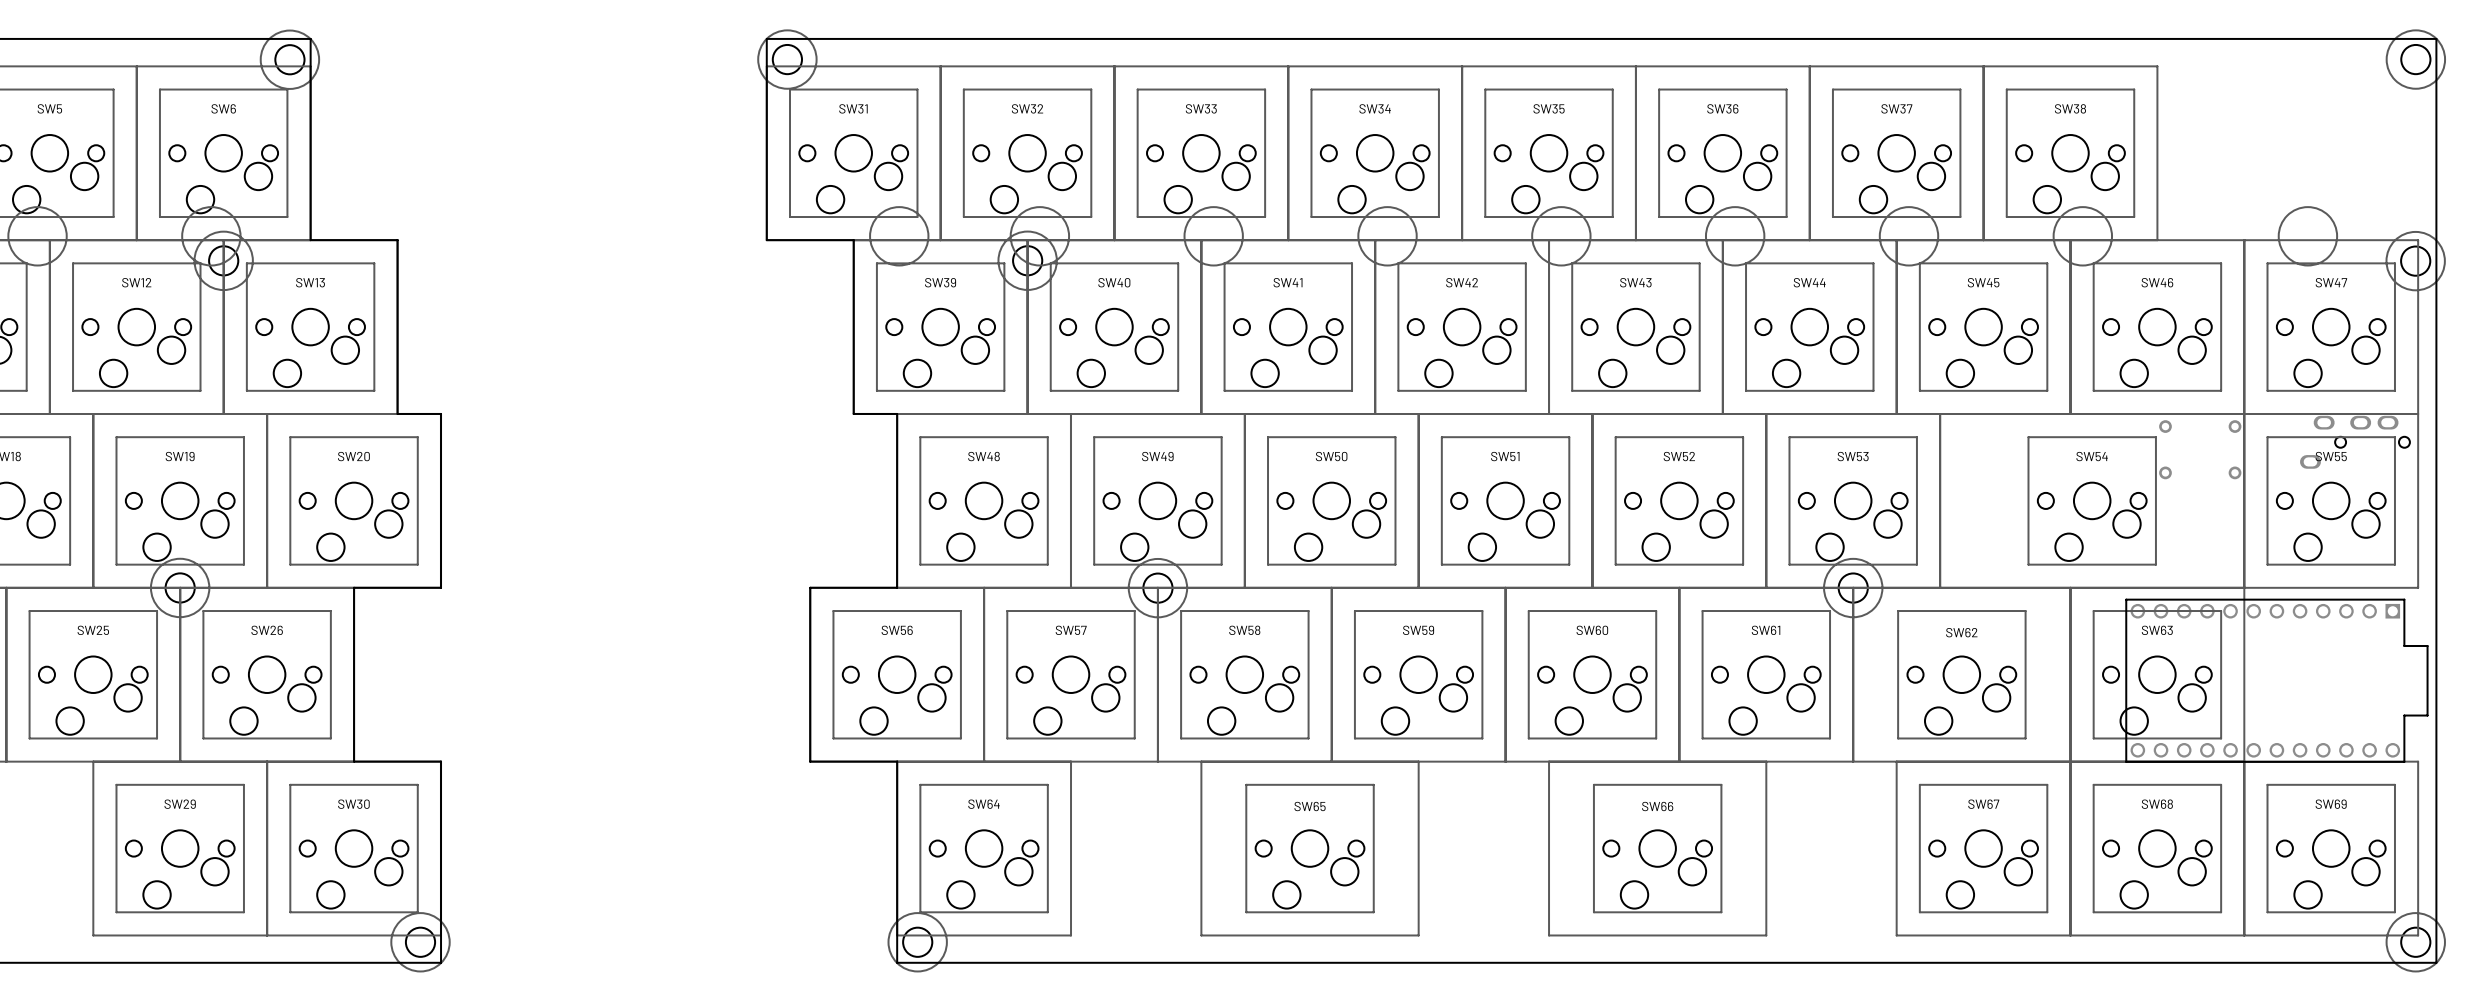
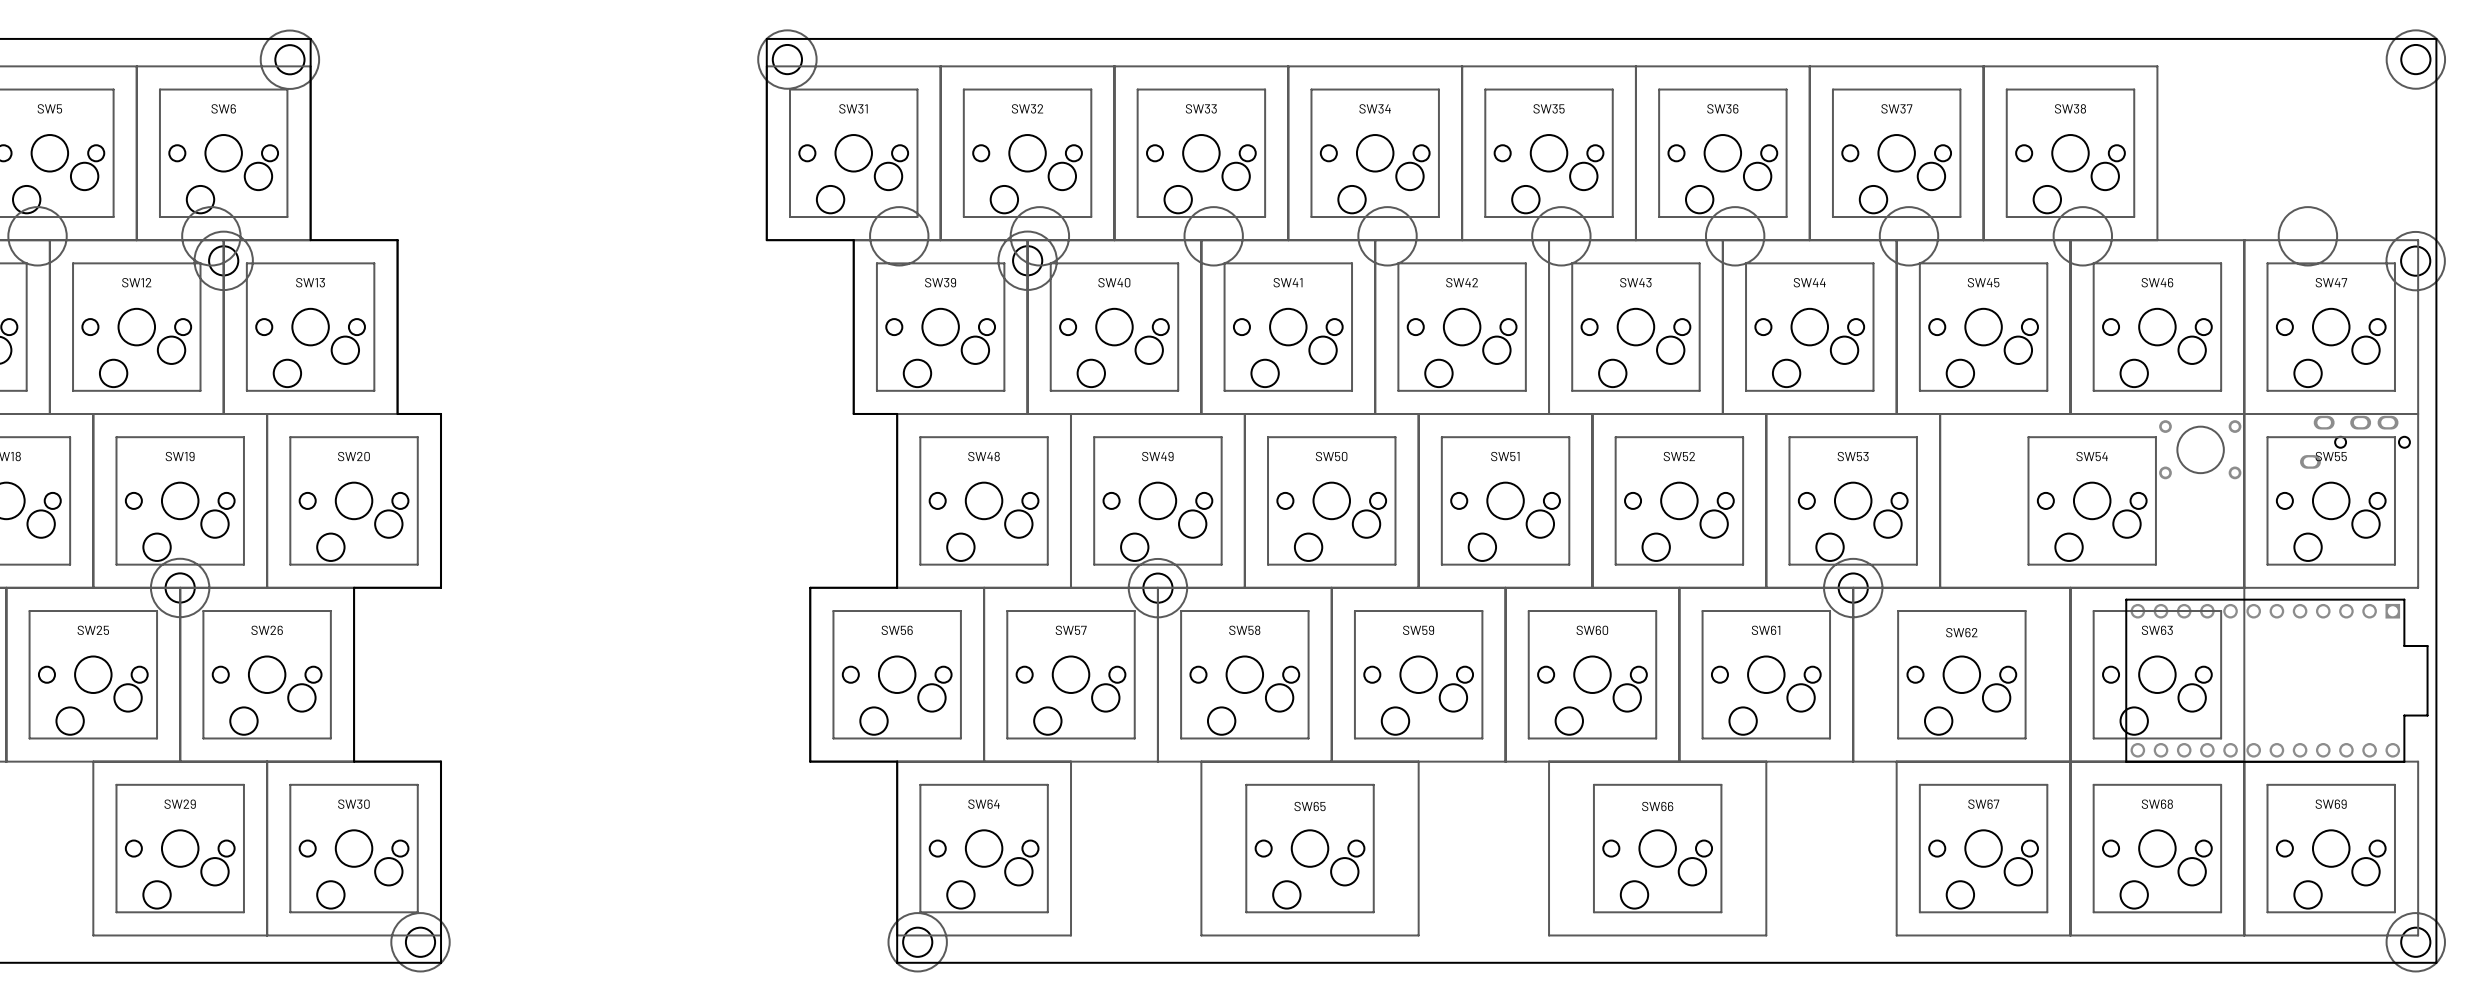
drawing: none -> [2176, 425, 2225, 475]

